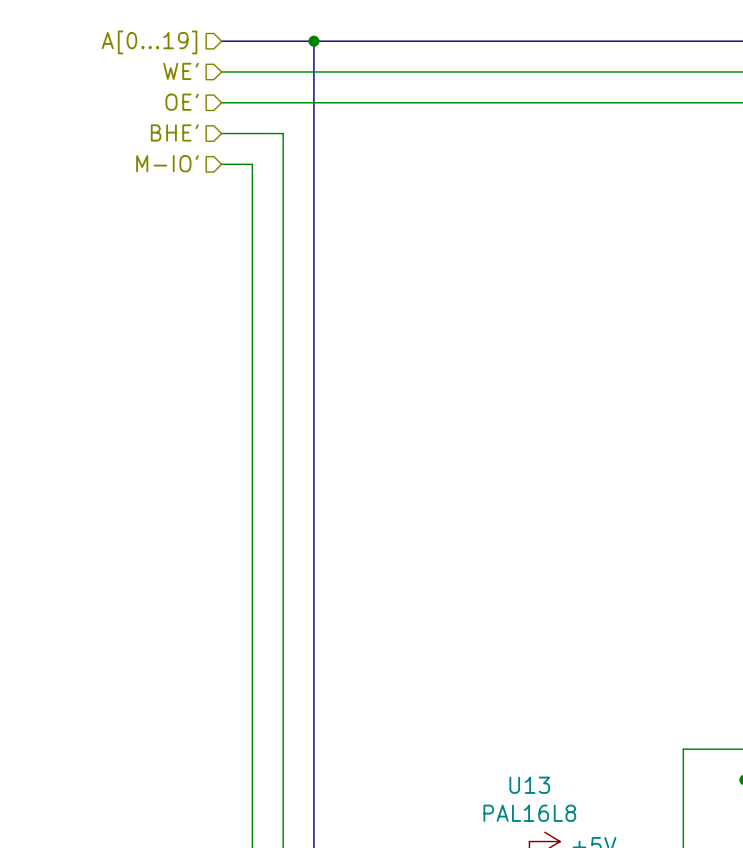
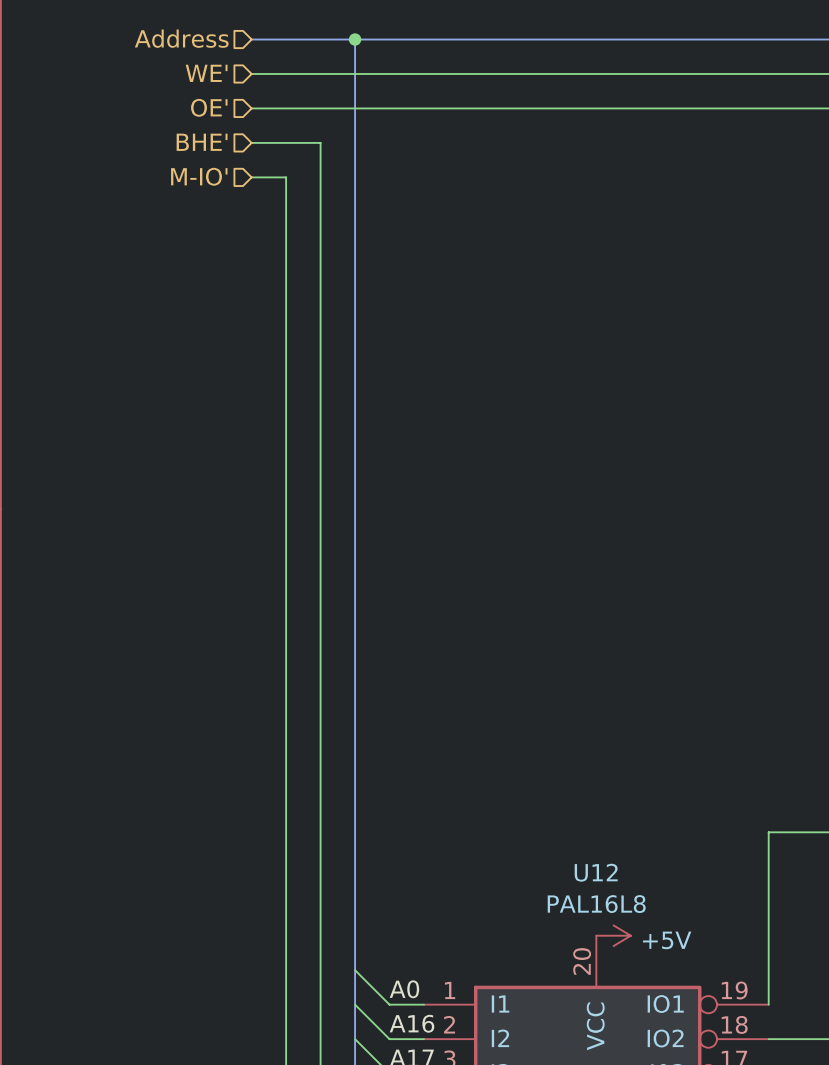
hierarchical label: A[0...19] (149, 42) -> Address (181, 38)
U13 name: U13 (529, 785) -> U12 (596, 872)

